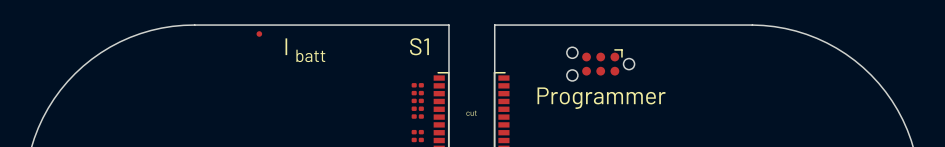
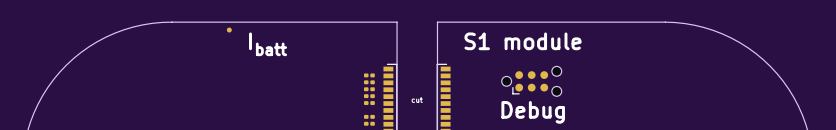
text: S1 (419, 46) -> none
text: none -> S1 module (523, 41)
part rotation: 0° (600, 64) -> 180° (531, 81)
text: Programmer (601, 98) -> none
text: none -> Debug (533, 112)

